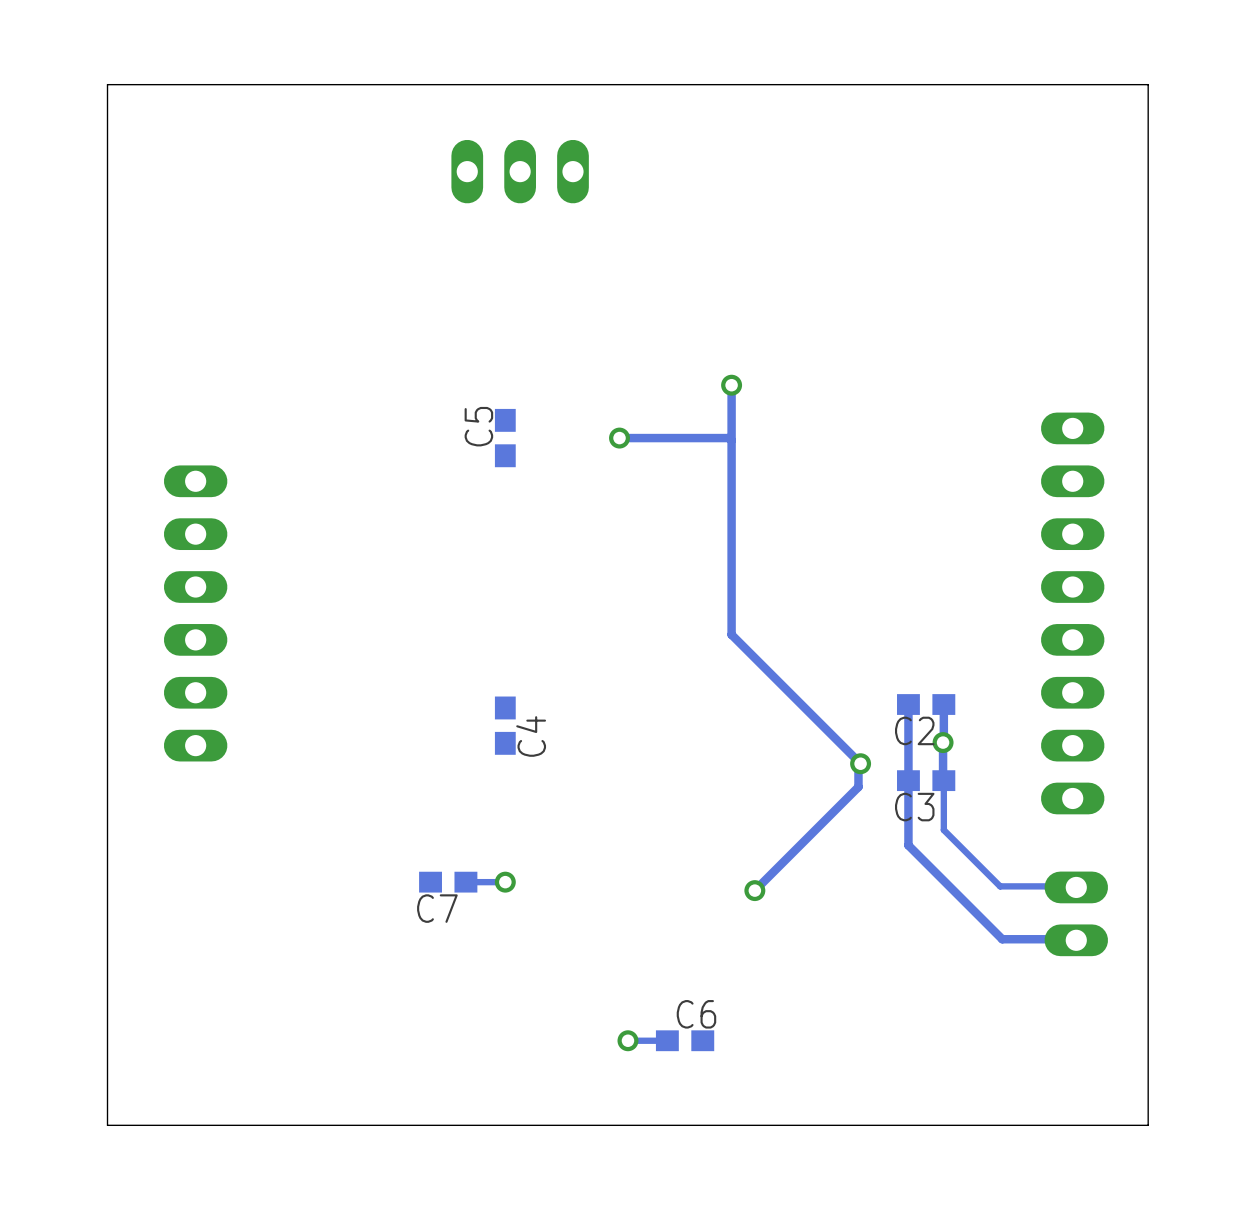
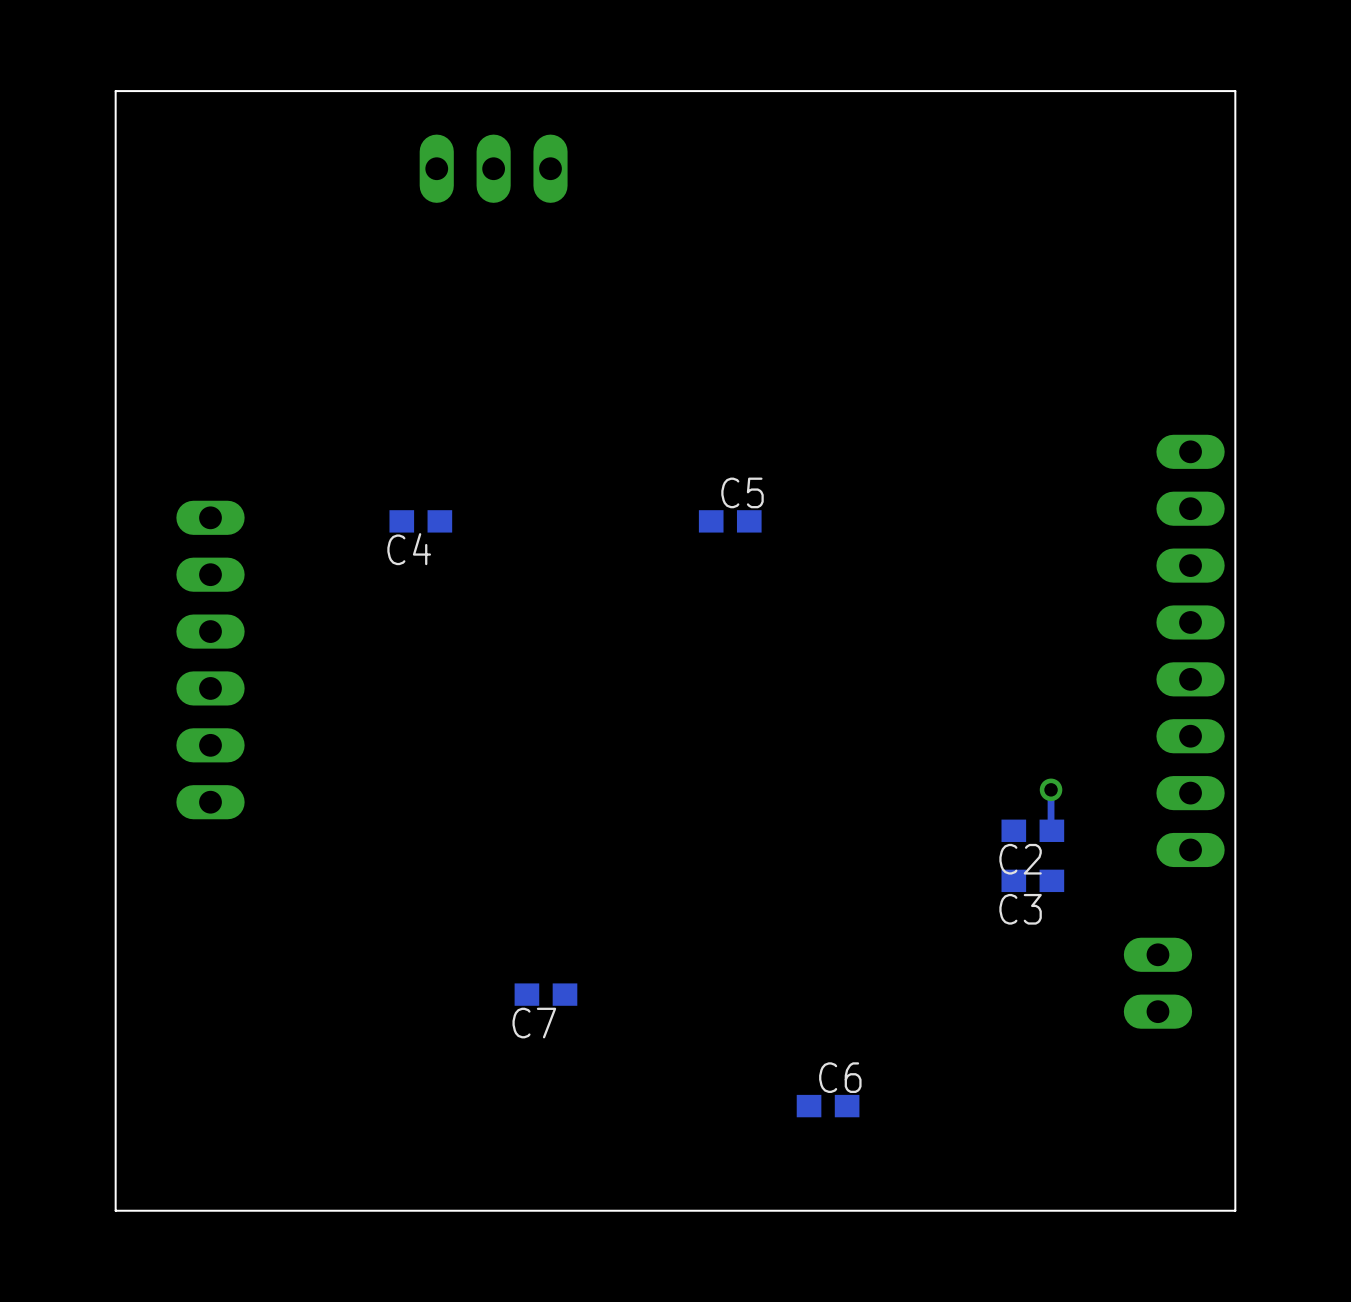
part position: (520, 171) -> (493, 168)
track: (731, 385) (731, 634) (860, 763) (858, 765) (858, 786) (754, 890) -> none
via: (731, 385) -> none
C5 rotation: 0° (505, 438) -> 90° clockwise (730, 521)
C5 position: (505, 438) -> (730, 521)
track: (619, 438) (729, 438) (731, 440) -> none
via: (619, 438) -> none
part position: (1072, 613) -> (1190, 650)
track: (908, 704) (908, 845) (1002, 939) (1076, 940) -> none
C2 position: (926, 704) -> (1032, 830)
track: (943, 704) (943, 779) -> none
C4 rotation: 0° (505, 725) -> 90° clockwise (420, 521)
C4 position: (505, 725) -> (420, 521)
track: none -> (1051, 789) (1051, 830)
via position: (943, 742) -> (1051, 789)
via: (860, 763) -> none
C3 position: (926, 780) -> (1032, 880)
track: (943, 780) (943, 830) (1000, 886) (1076, 887) -> none
C7 position: (448, 882) -> (545, 994)
track: (505, 882) (465, 882) -> none
via: (505, 882) -> none
via: (754, 890) -> none
via: (627, 1040) -> none
track: (667, 1040) (627, 1040) -> none
C6 position: (685, 1040) -> (828, 1106)

